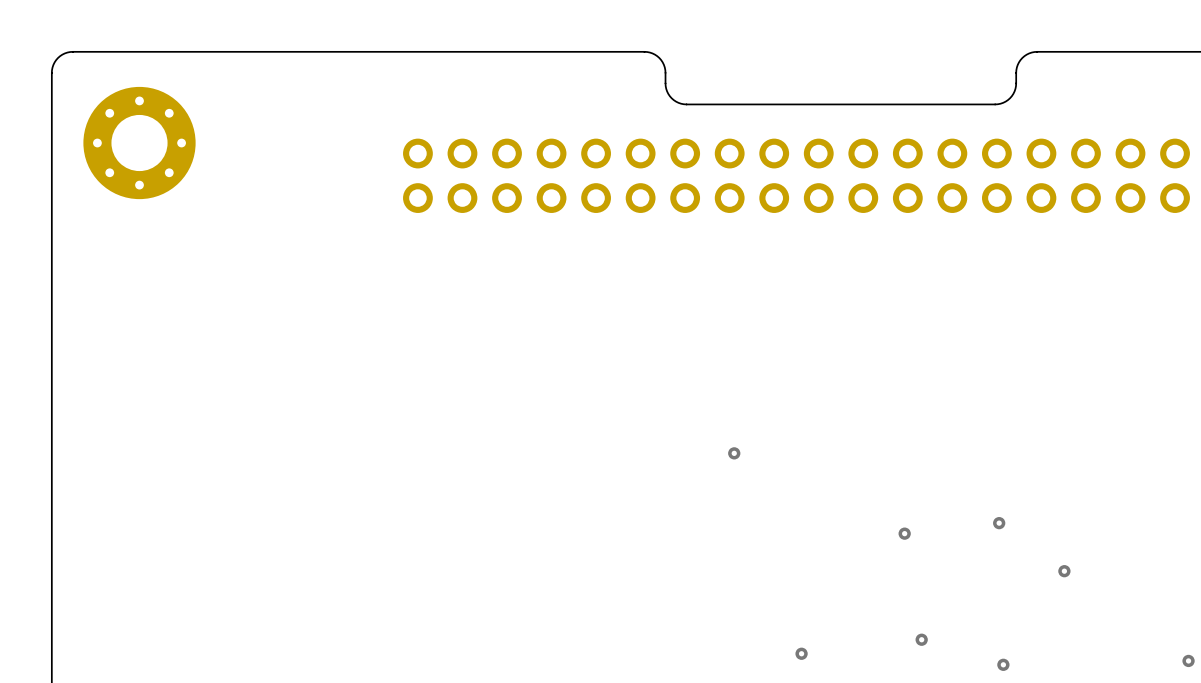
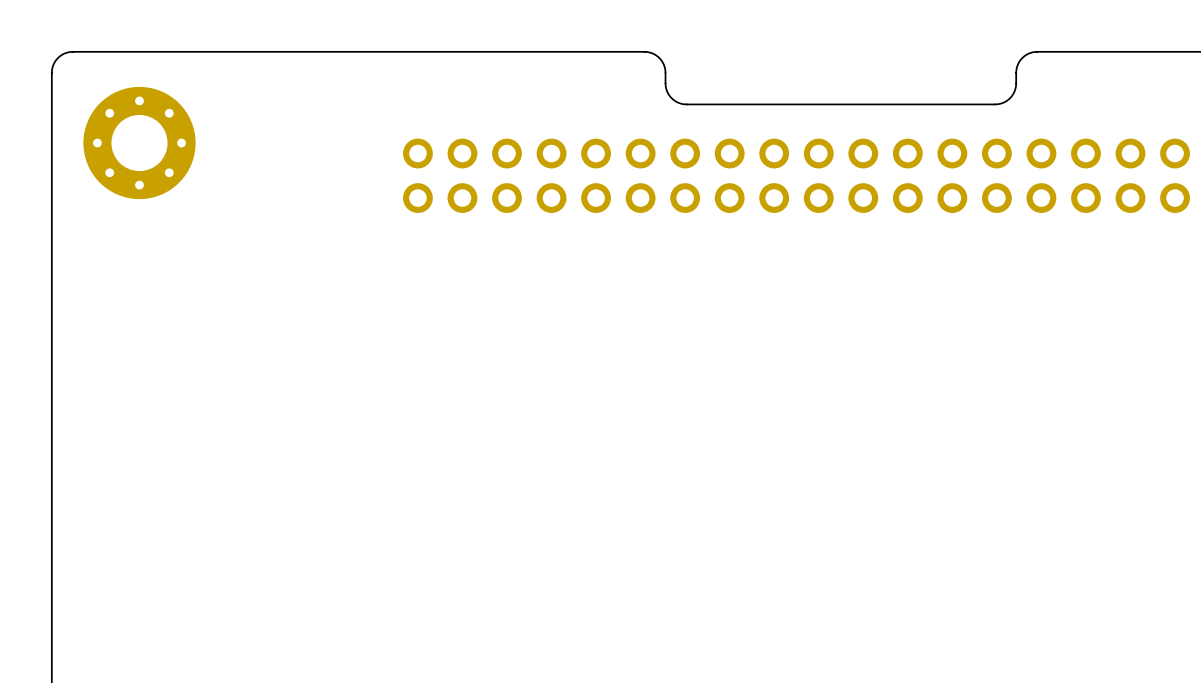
via: (734, 453) -> none
via: (999, 523) -> none
via: (904, 533) -> none
via: (1064, 571) -> none
via: (921, 639) -> none
via: (801, 653) -> none
via: (1188, 660) -> none
via: (1003, 664) -> none

